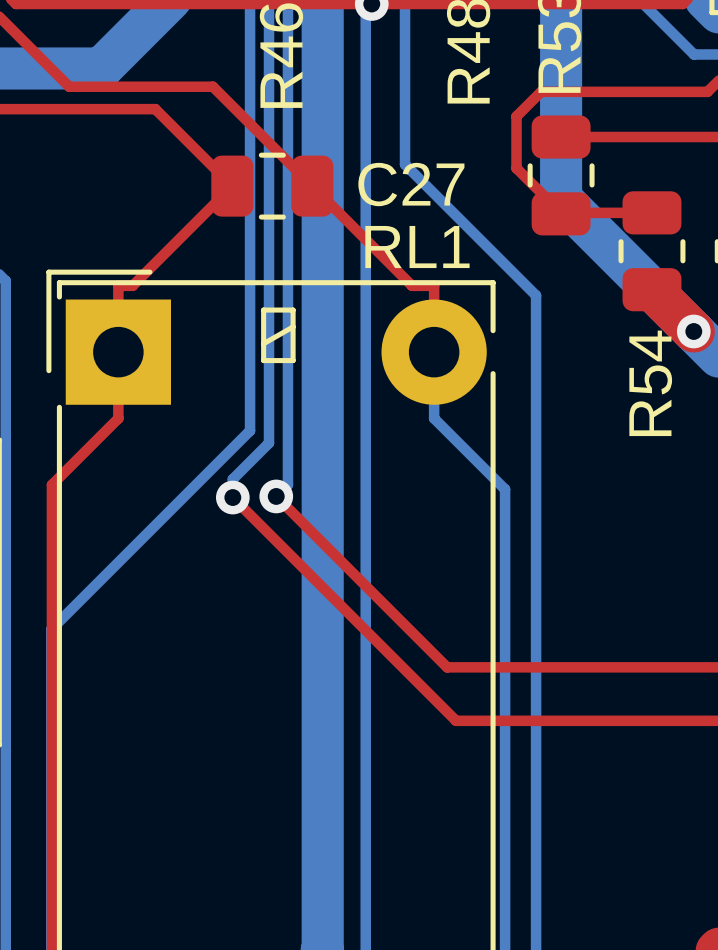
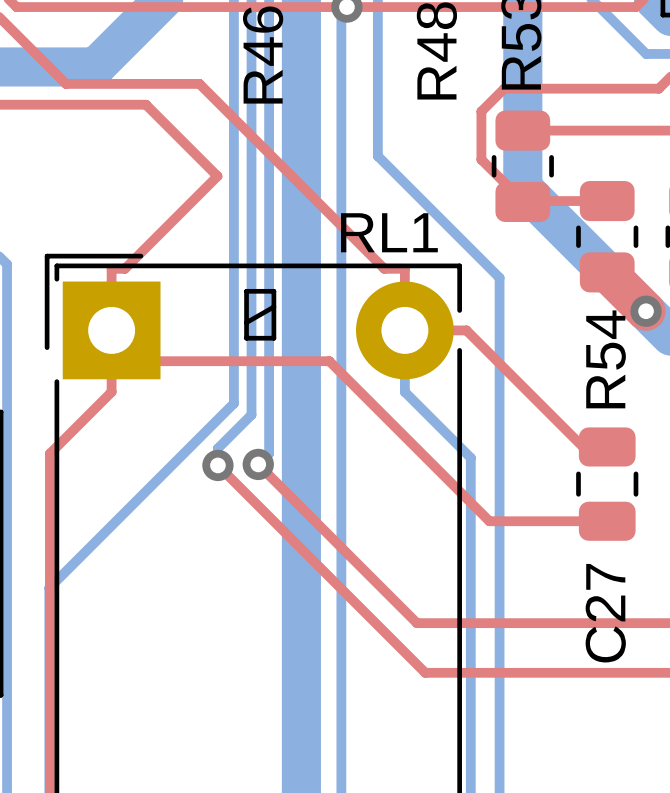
C27 rotation: 0° (272, 186) -> 90° clockwise (607, 484)
C27 position: (272, 186) -> (607, 484)
top track: none -> (404, 330) (466, 330) (583, 446) (607, 446)
top track: none -> (111, 361) (329, 361) (489, 521) (607, 521)

